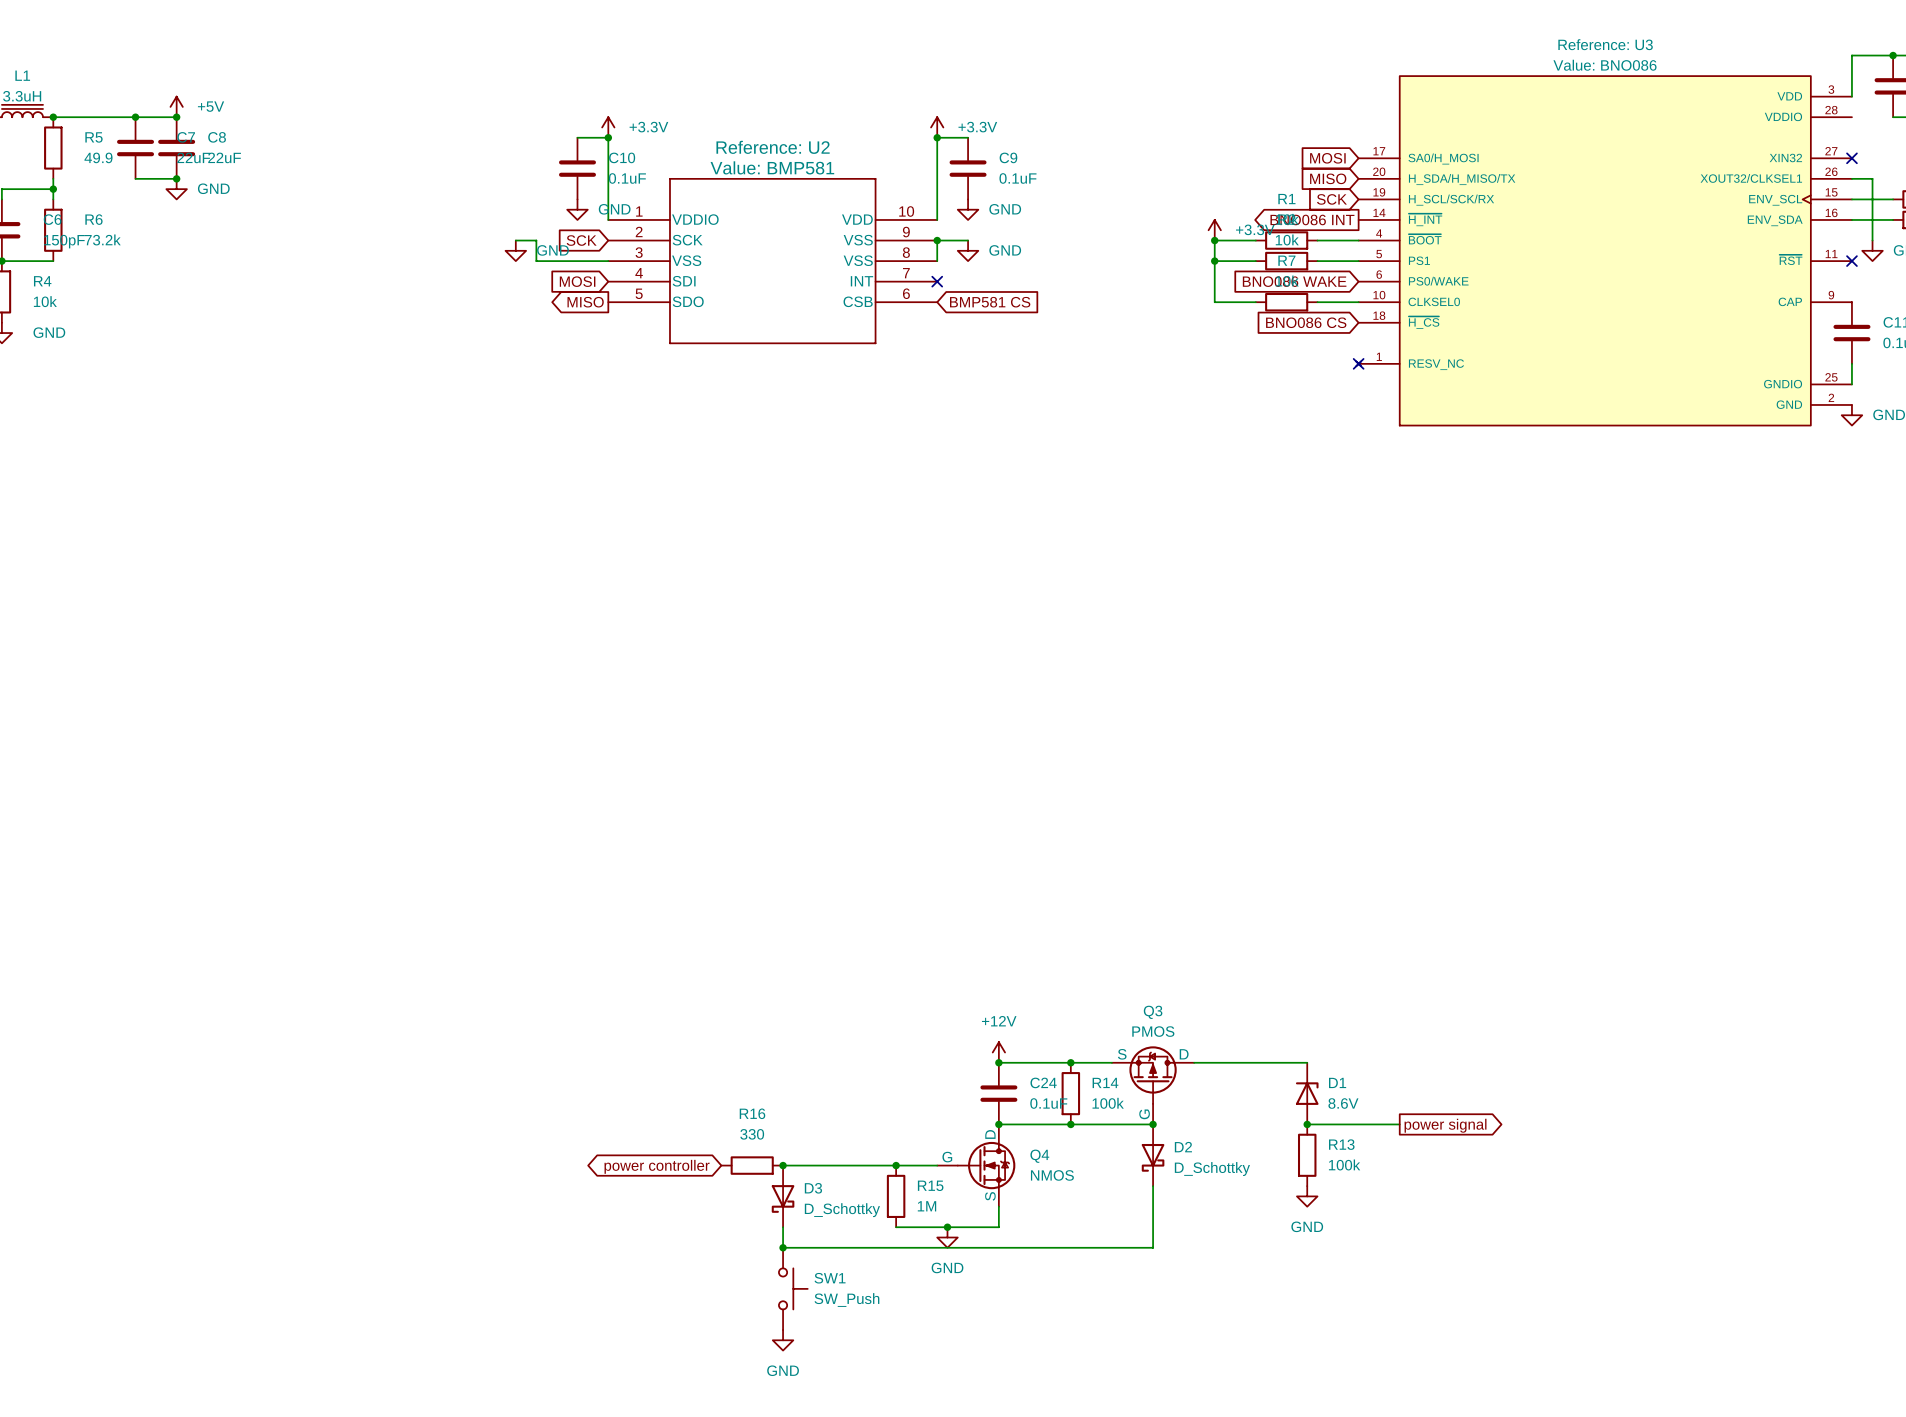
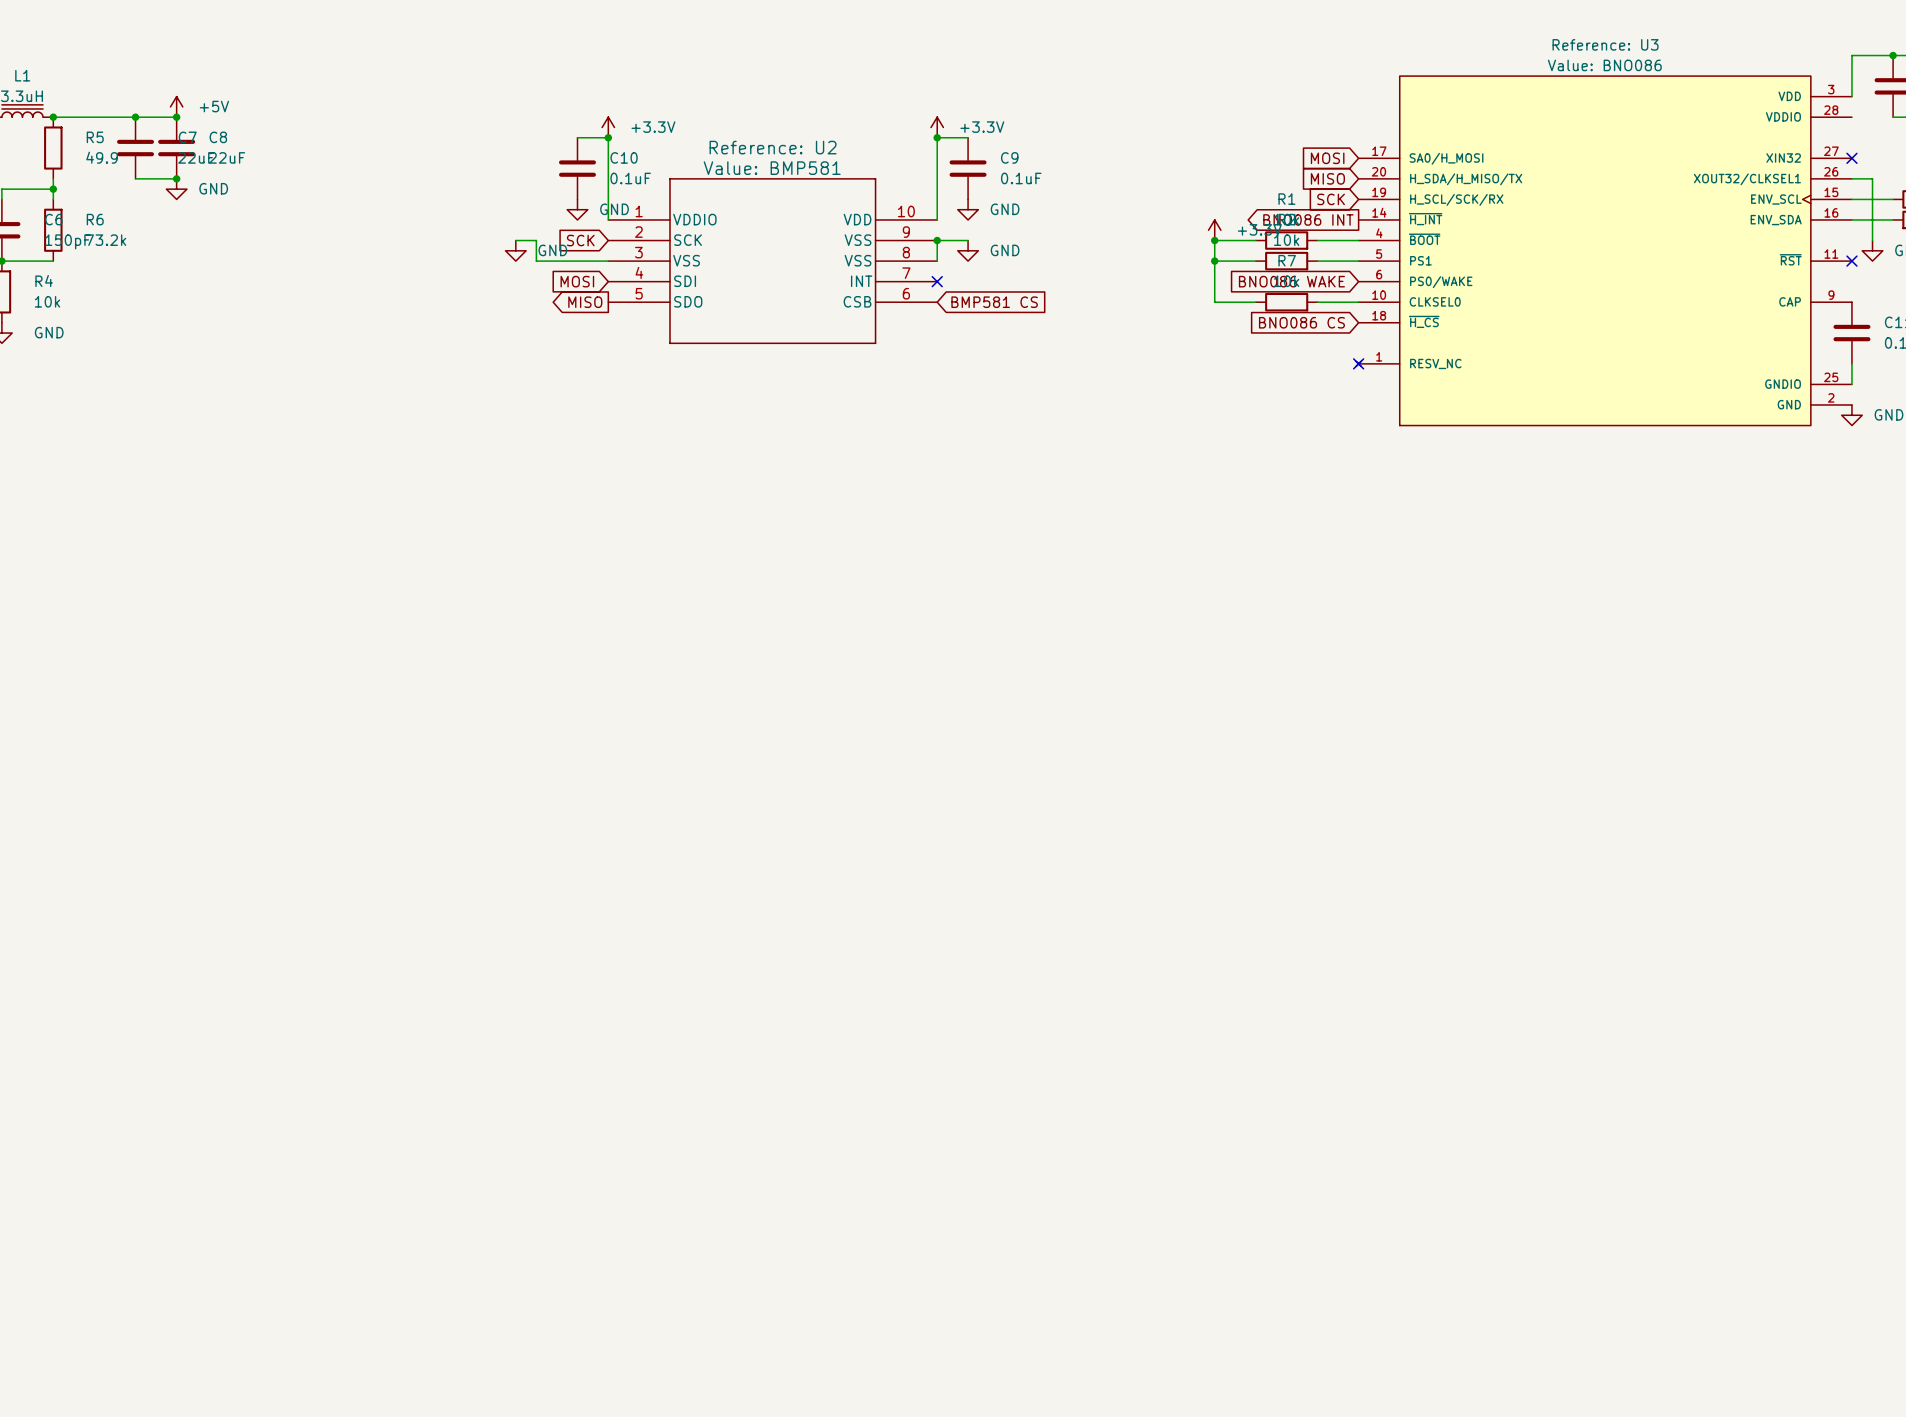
power symbol: +12V (998, 1052) -> none
wire: (998, 1062) (1111, 1062) -> none
junction: (998, 1062) -> none
junction: (1070, 1062) -> none
wire: (1194, 1062) (1307, 1062) -> none
Q3: PMOS (1153, 1085) -> none
C24: 0.1uF (998, 1093) -> none
R14: 100k (1070, 1093) -> none
D1: 8.6V (1307, 1093) -> none
wire: (998, 1124) (1153, 1124) -> none
junction: (998, 1124) -> none
junction: (1070, 1124) -> none
junction: (1153, 1124) -> none
wire: (1307, 1124) (1399, 1124) -> none
junction: (1307, 1124) -> none
global label: power signal (1445, 1125) -> none
D2: D_Schottky (1153, 1155) -> none
R13: 100k (1307, 1155) -> none
R16: 330 (752, 1165) -> none
wire: (783, 1165) (937, 1165) -> none
junction: (783, 1165) -> none
junction: (896, 1165) -> none
Q4: NMOS (976, 1165) -> none
global label: power controller (657, 1166) -> none
wire: (1153, 1186) (1153, 1247) (783, 1247) (783, 1227) -> none
D3: D_Schottky (783, 1196) -> none
R15: 1M (896, 1196) -> none
power symbol: GND (1307, 1196) -> none
wire: (998, 1206) (998, 1227) (896, 1227) -> none
junction: (947, 1227) -> none
power symbol: GND (947, 1237) -> none
junction: (783, 1247) -> none
SW1: SW_Push (793, 1288) -> none
power symbol: GND (783, 1340) -> none

